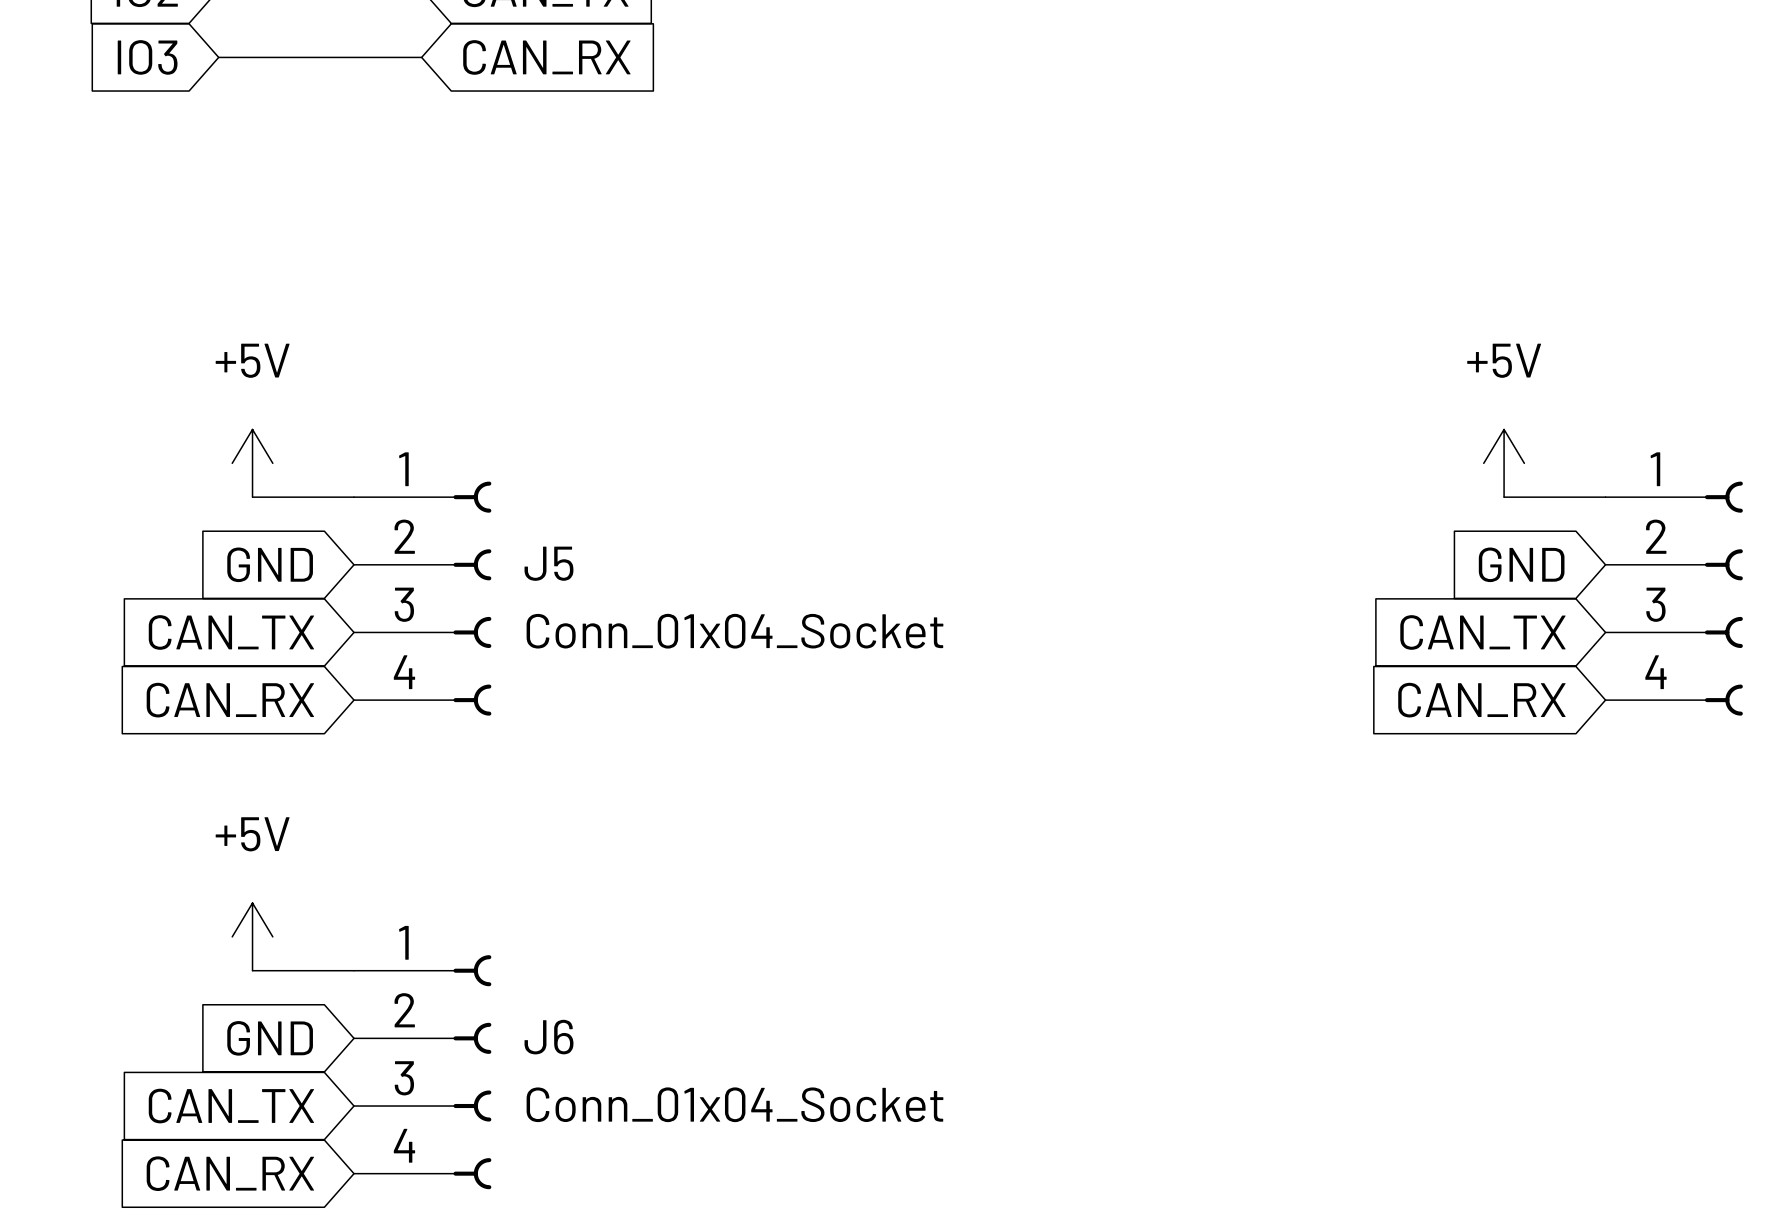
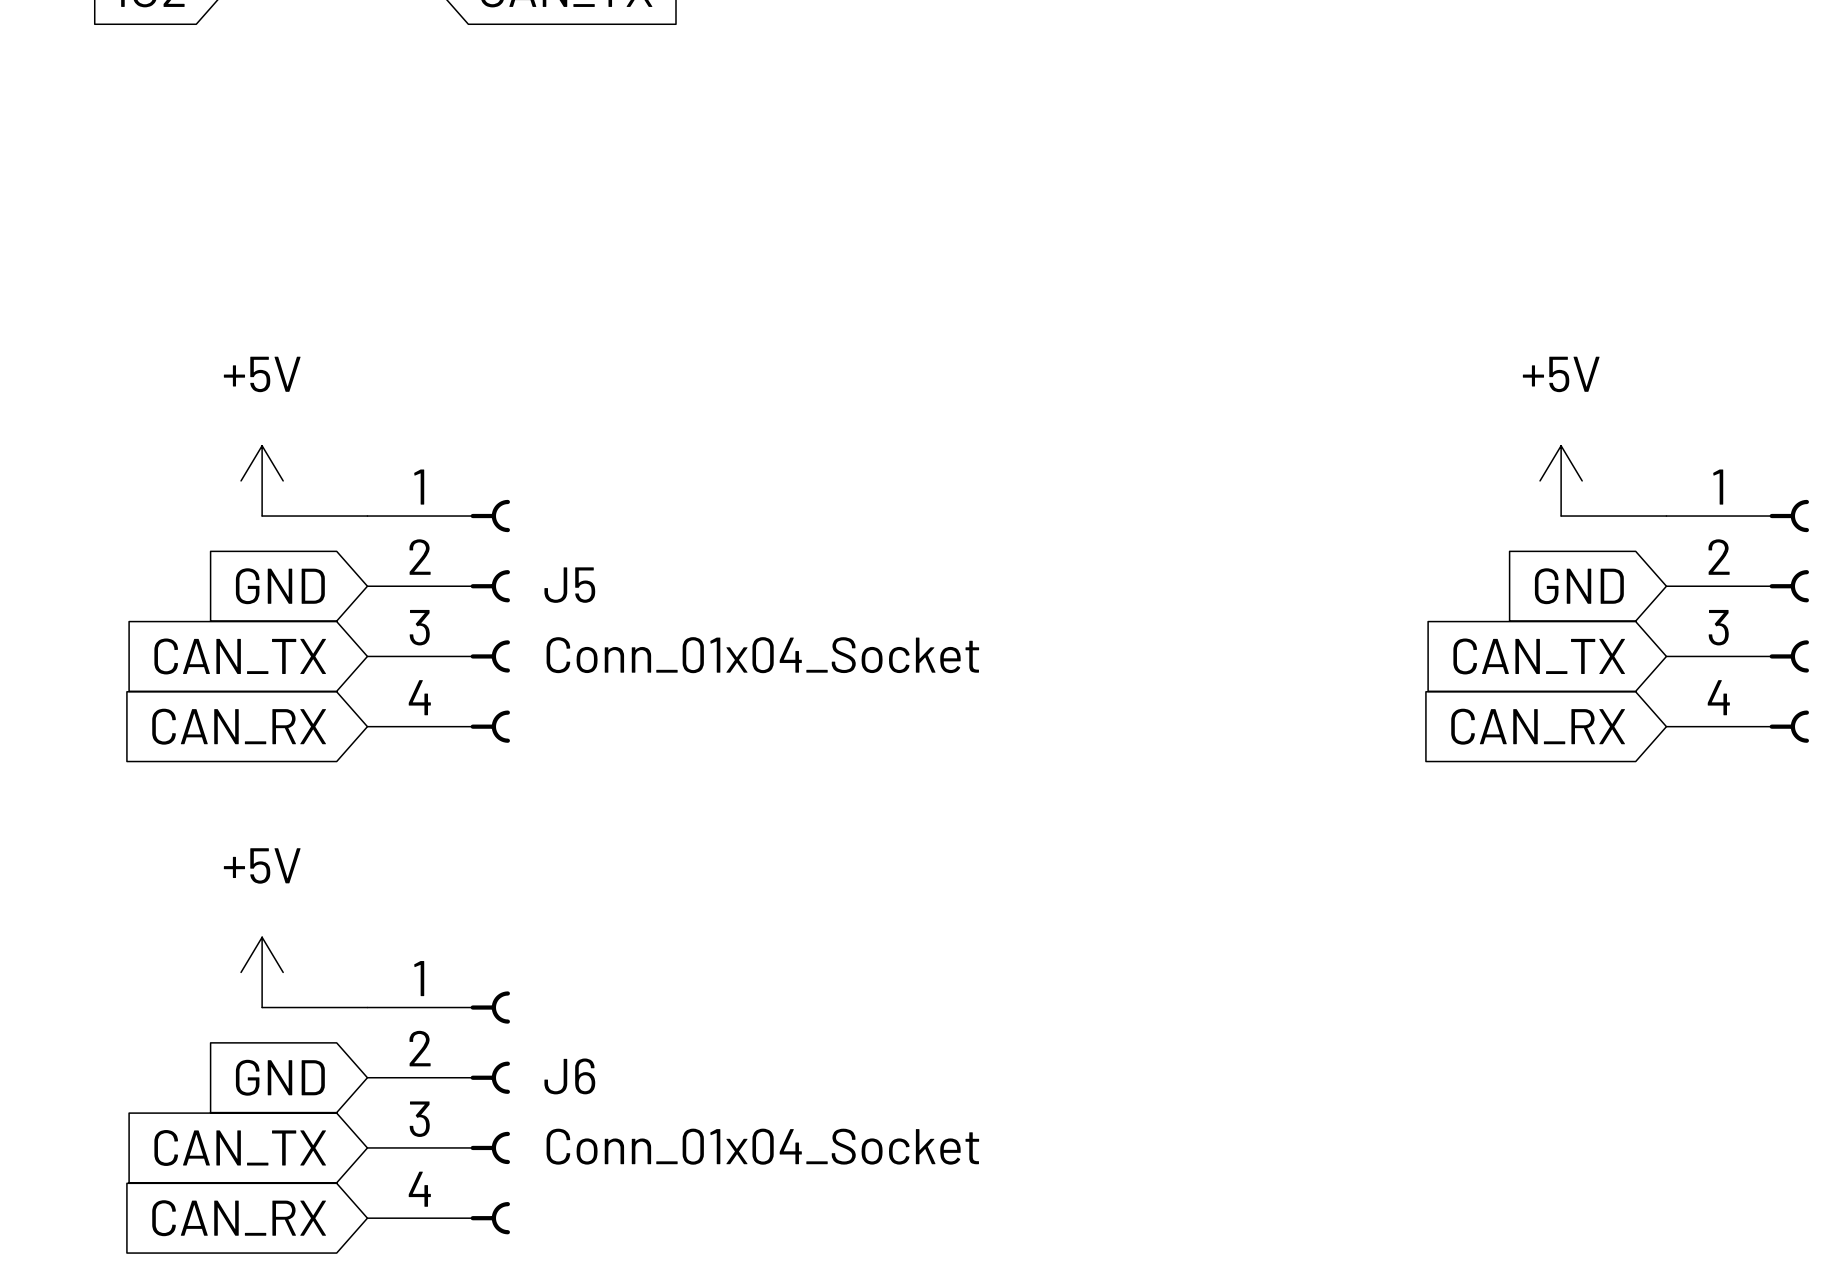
global label: IO3 (147, 57) -> none
wire: (218, 57) (421, 57) -> none
global label: CAN_RX (546, 57) -> none

